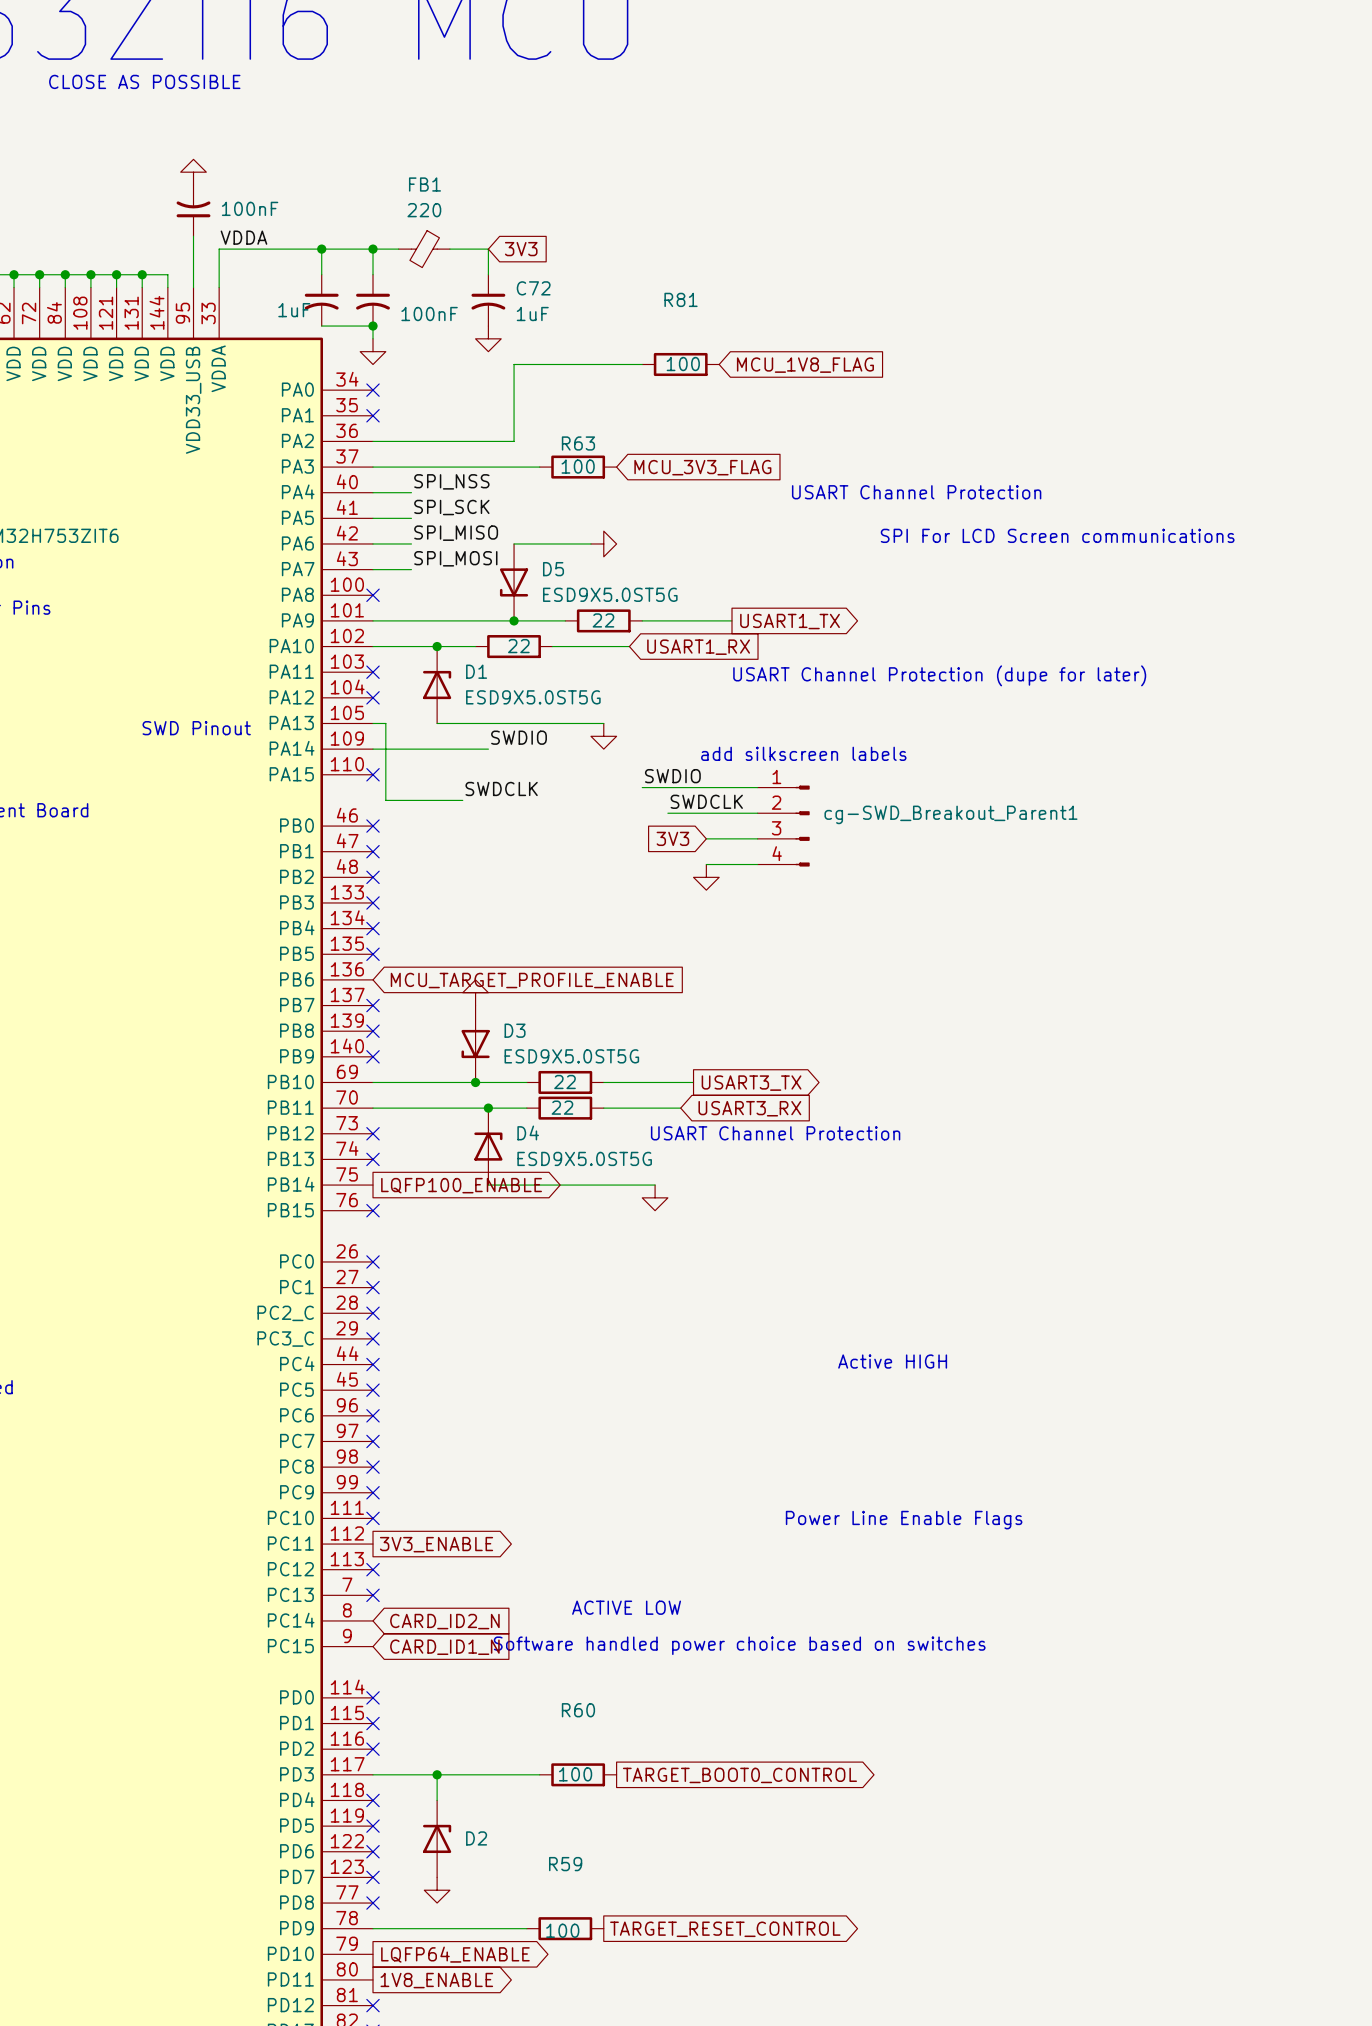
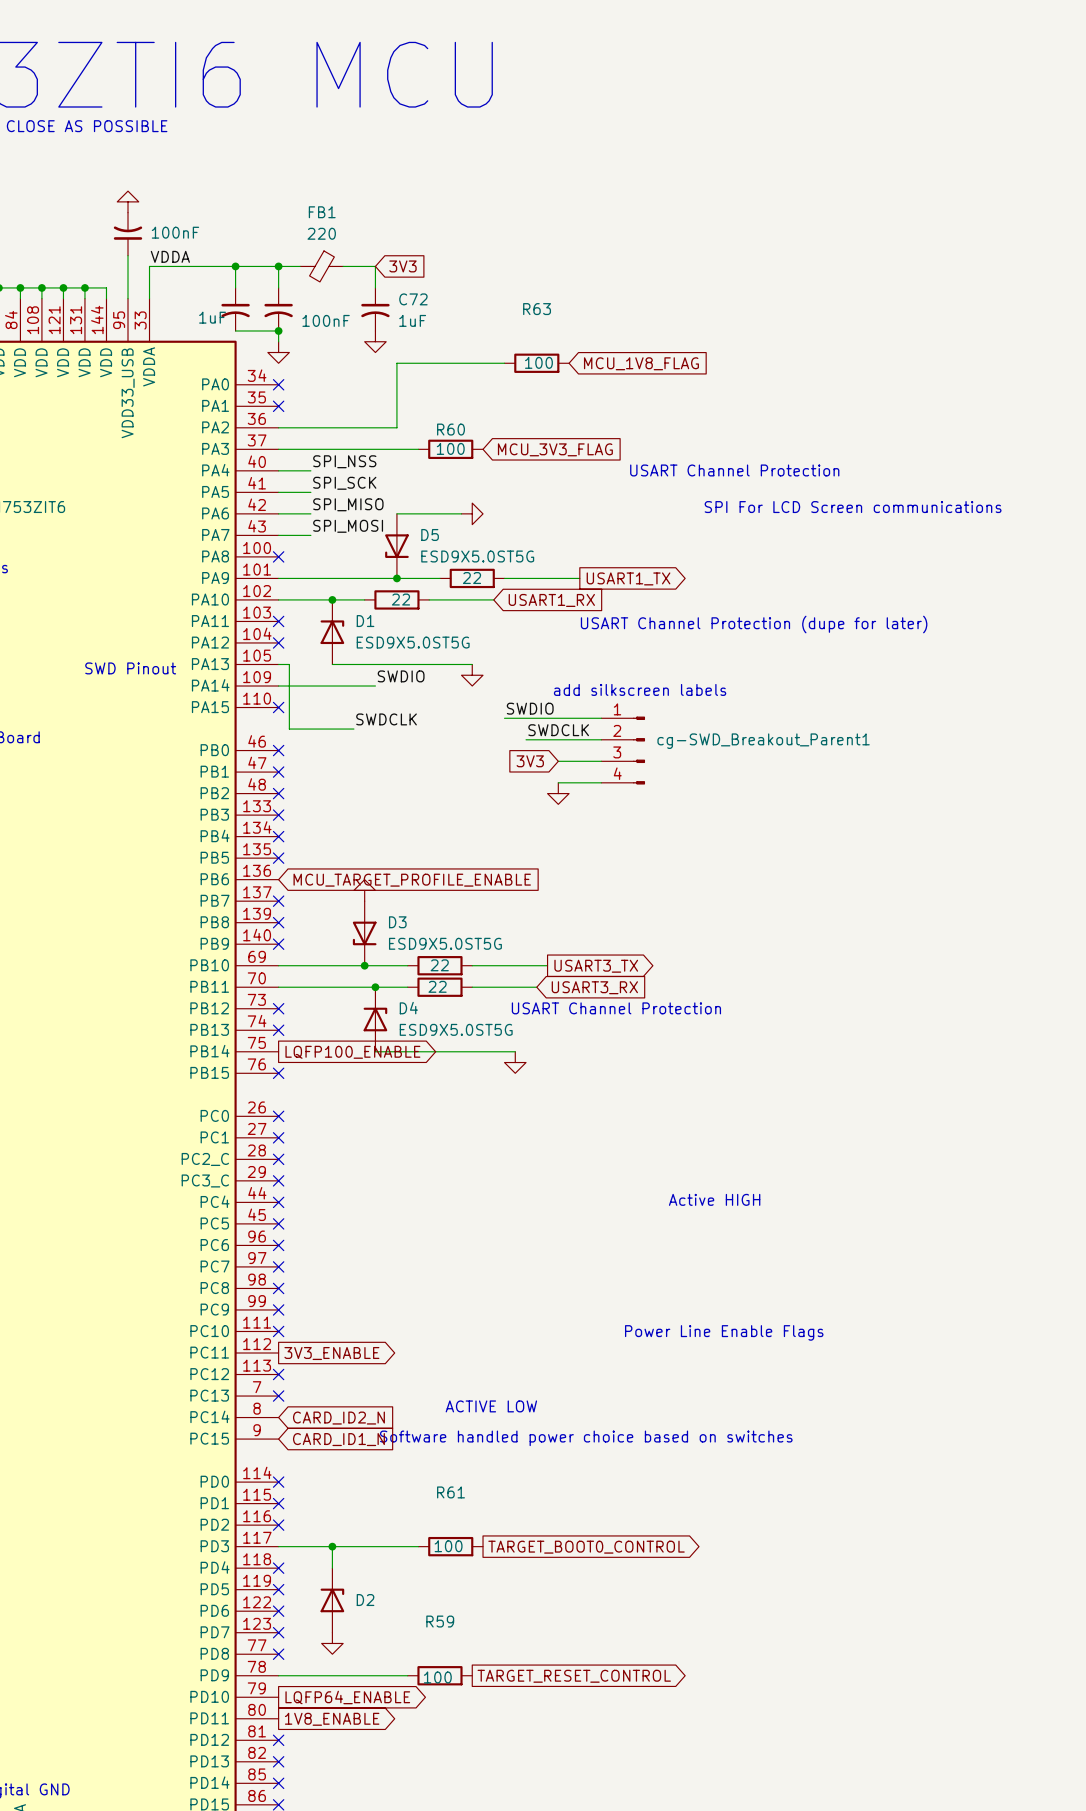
R81 name: R81 (681, 299) -> R63 (537, 309)
R63 name: R63 (578, 443) -> R60 (450, 429)
R60 name: R60 (578, 1710) -> R61 (450, 1492)

